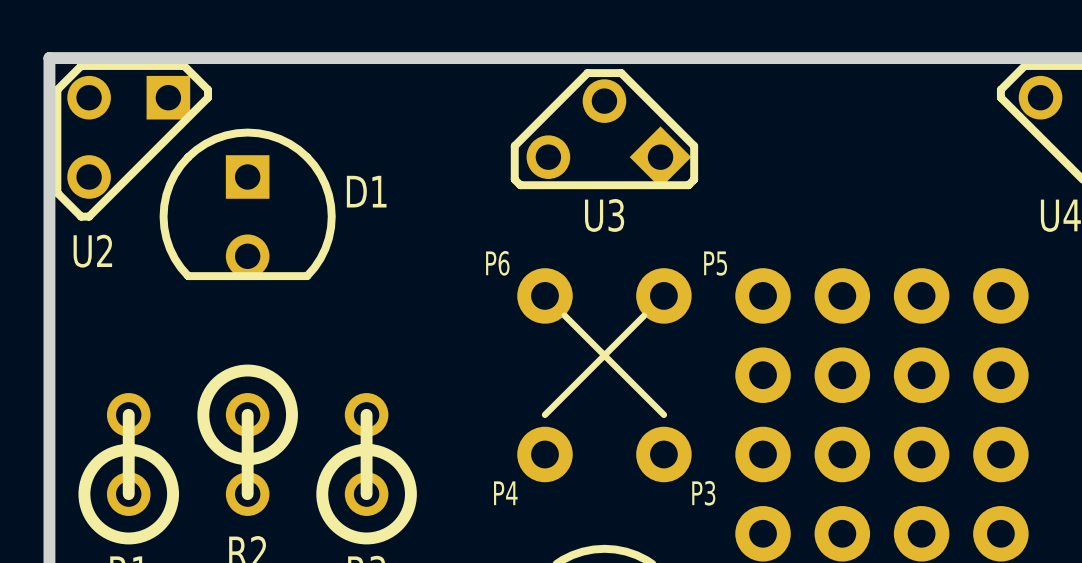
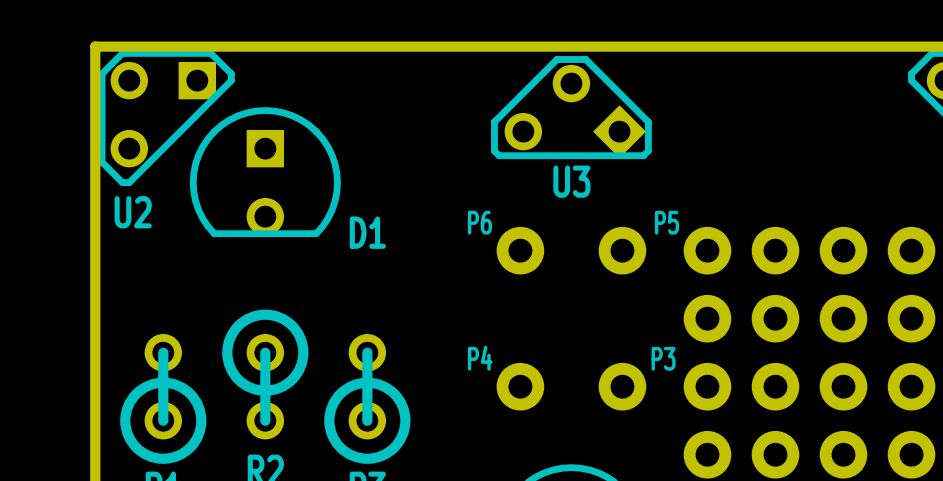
D1 name position: D1 (366, 191) -> D1 (367, 232)
line: (564, 315) (663, 414) -> none
line: (644, 315) (544, 414) -> none
P4 name position: P4 (505, 493) -> P4 (480, 358)
P3 name position: P3 (703, 493) -> P3 (663, 358)

